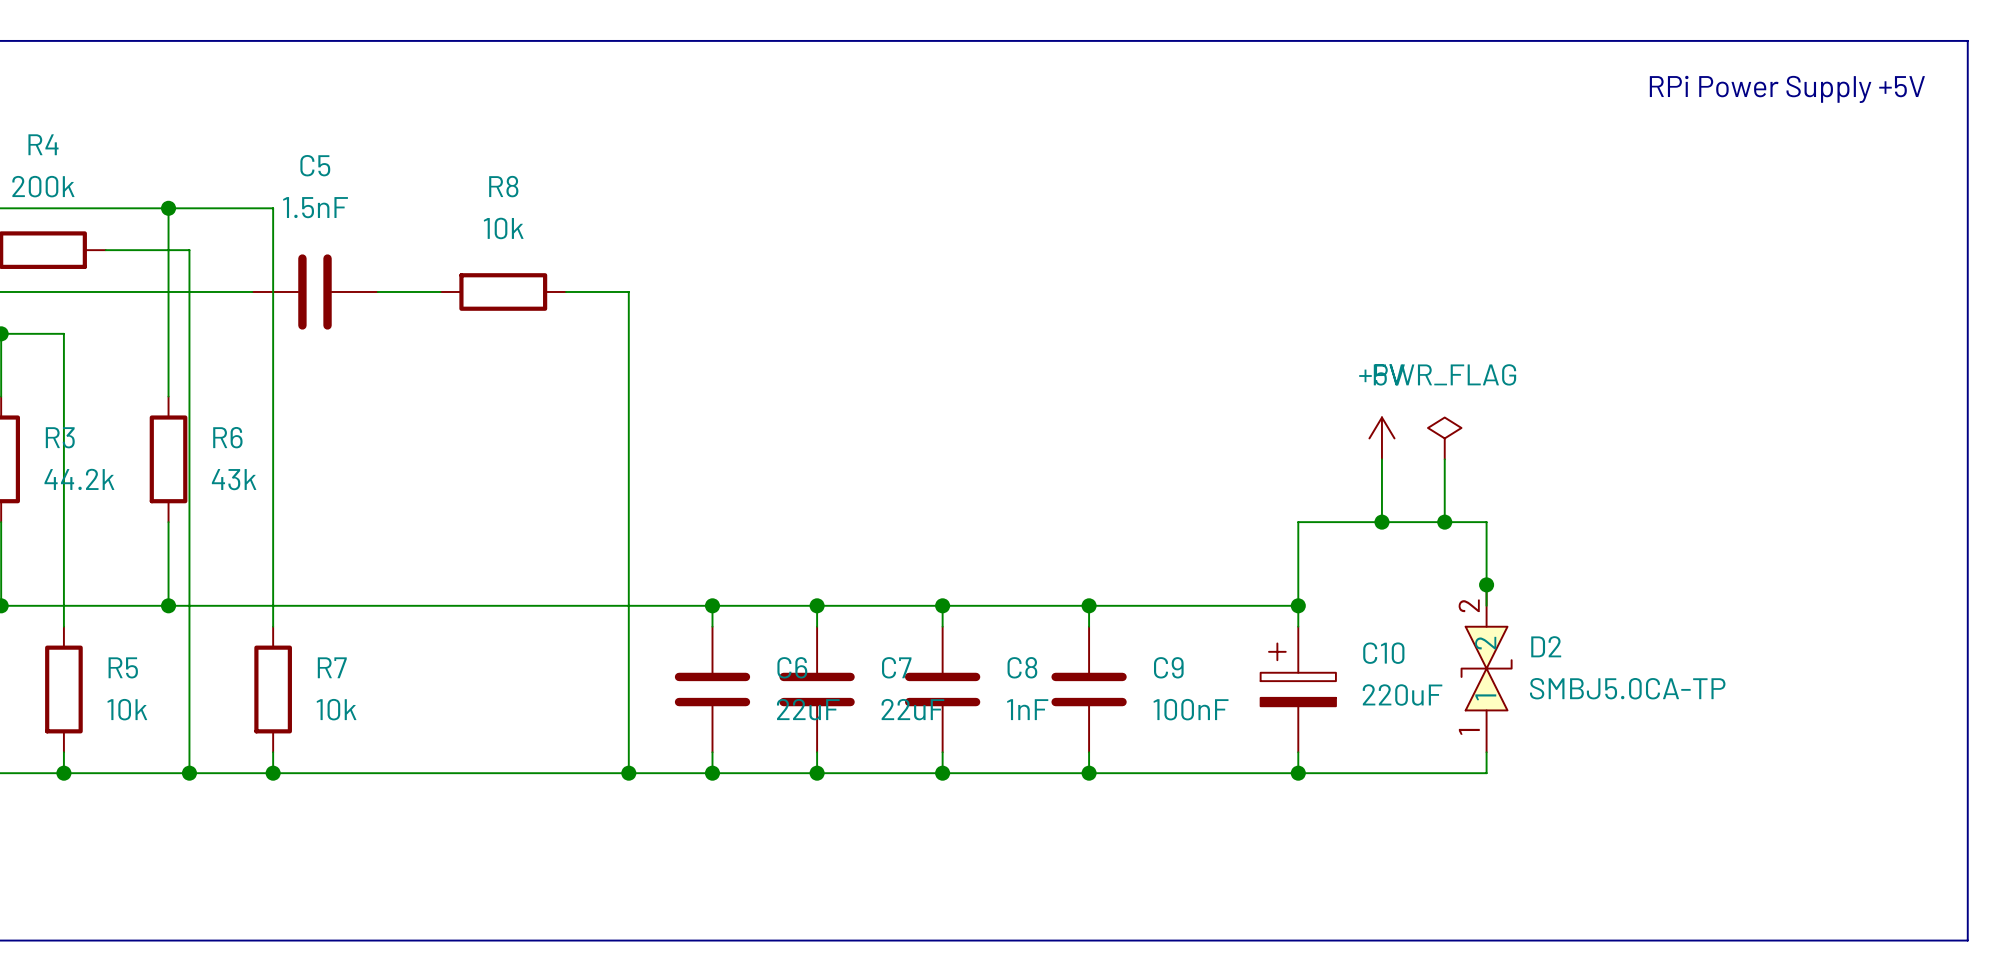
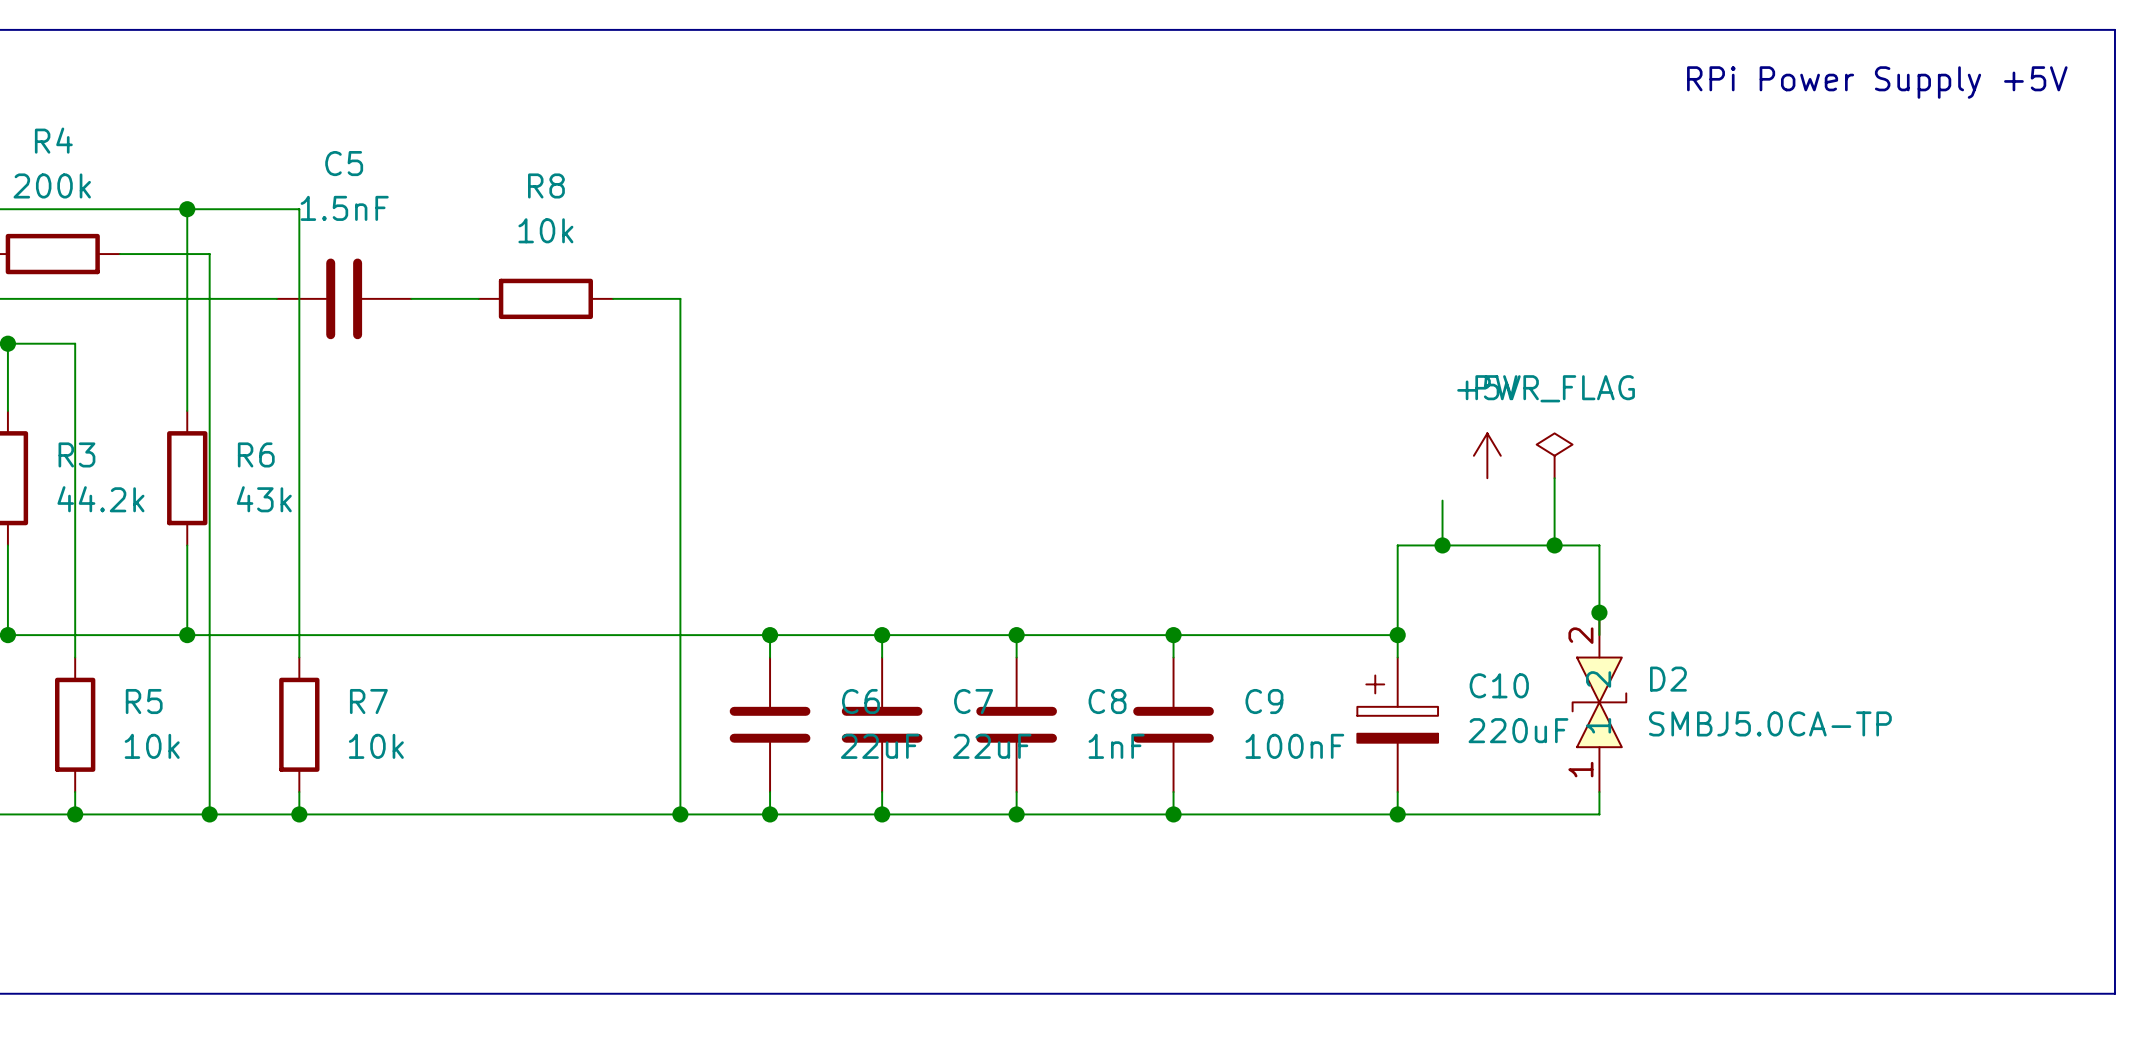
wire: (1381, 459) (1381, 522) -> none
wire: none -> (1442, 500) (1442, 545)
junction position: (1381, 522) -> (1442, 545)

